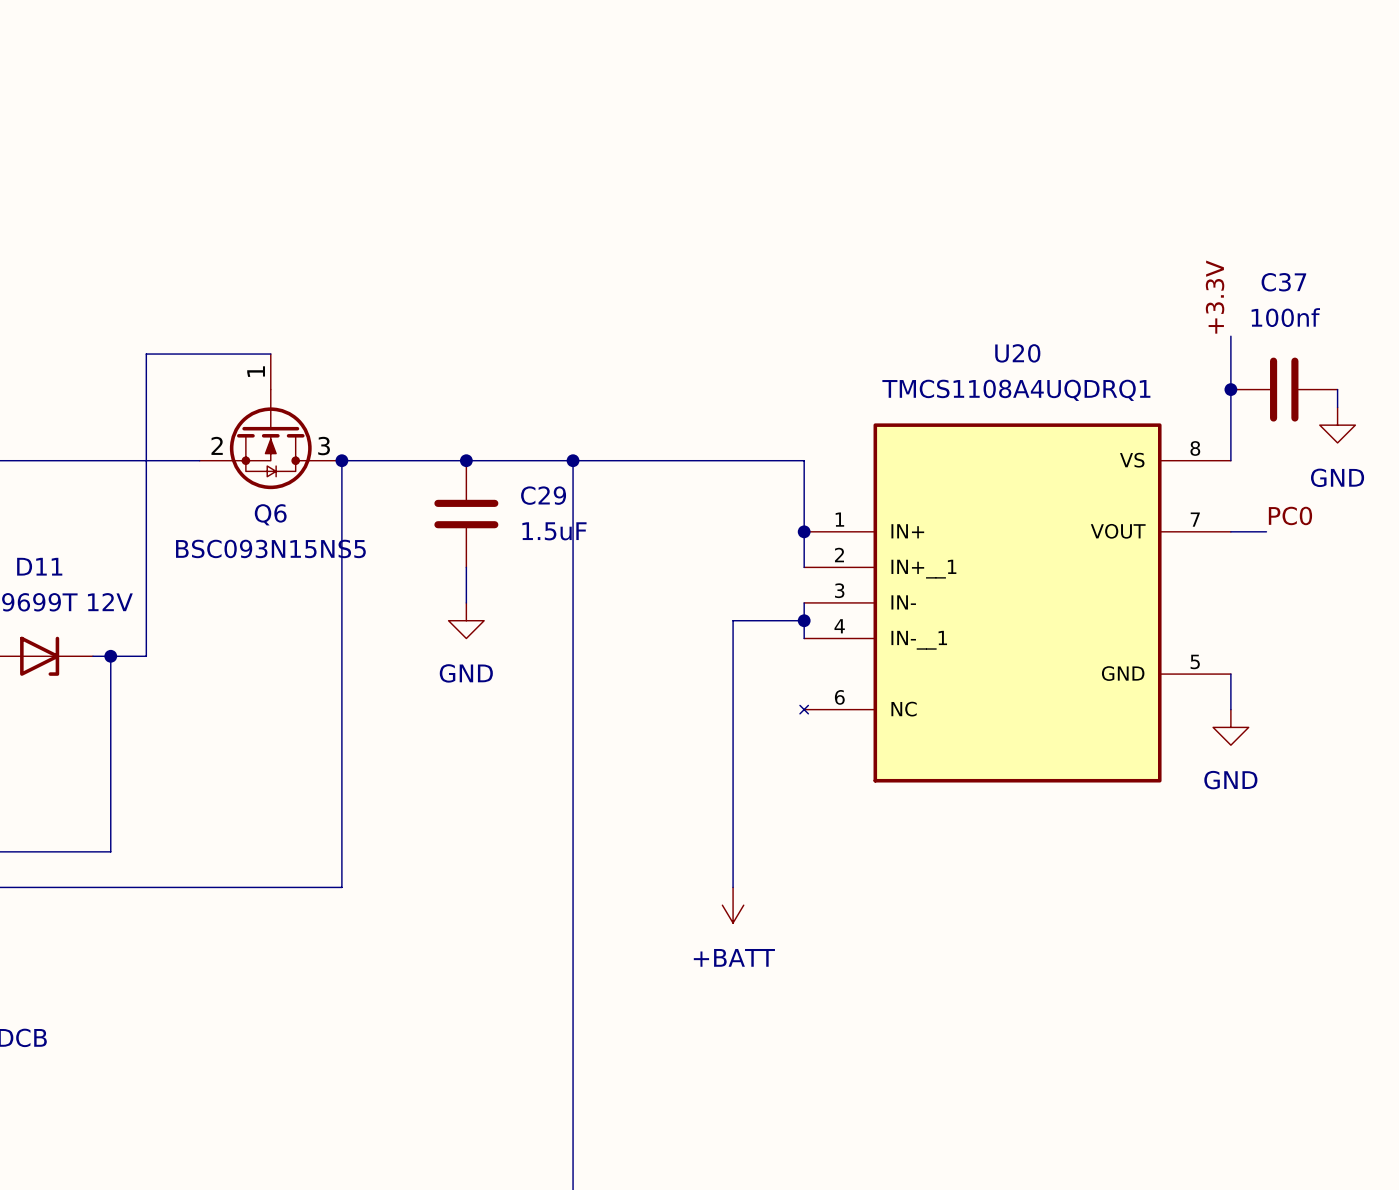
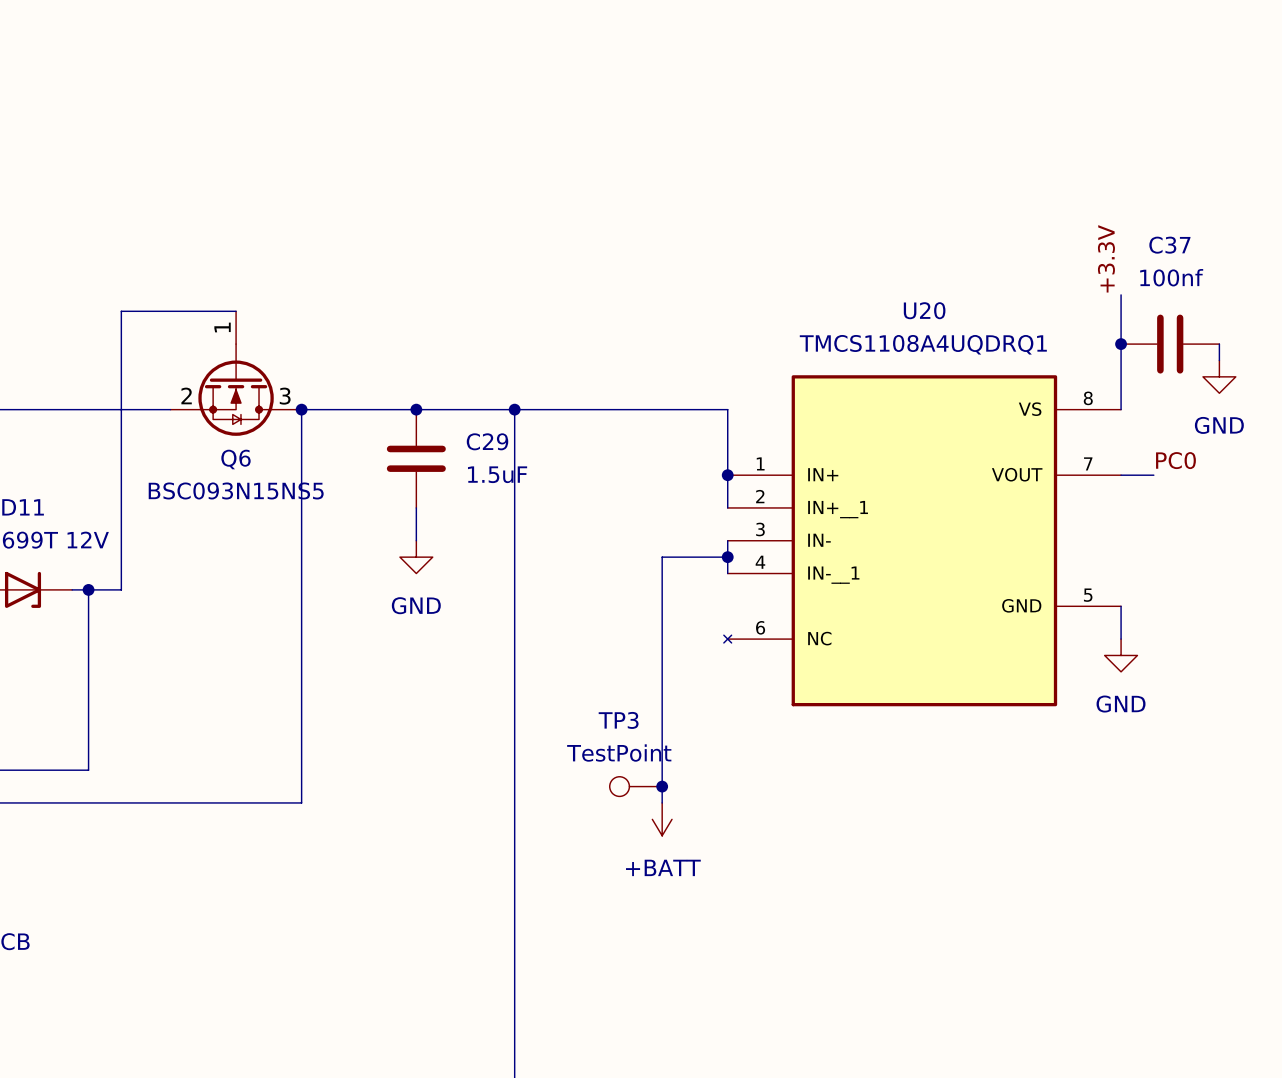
TP3: none -> TestPoint (635, 786)
junction: none -> (662, 786)

